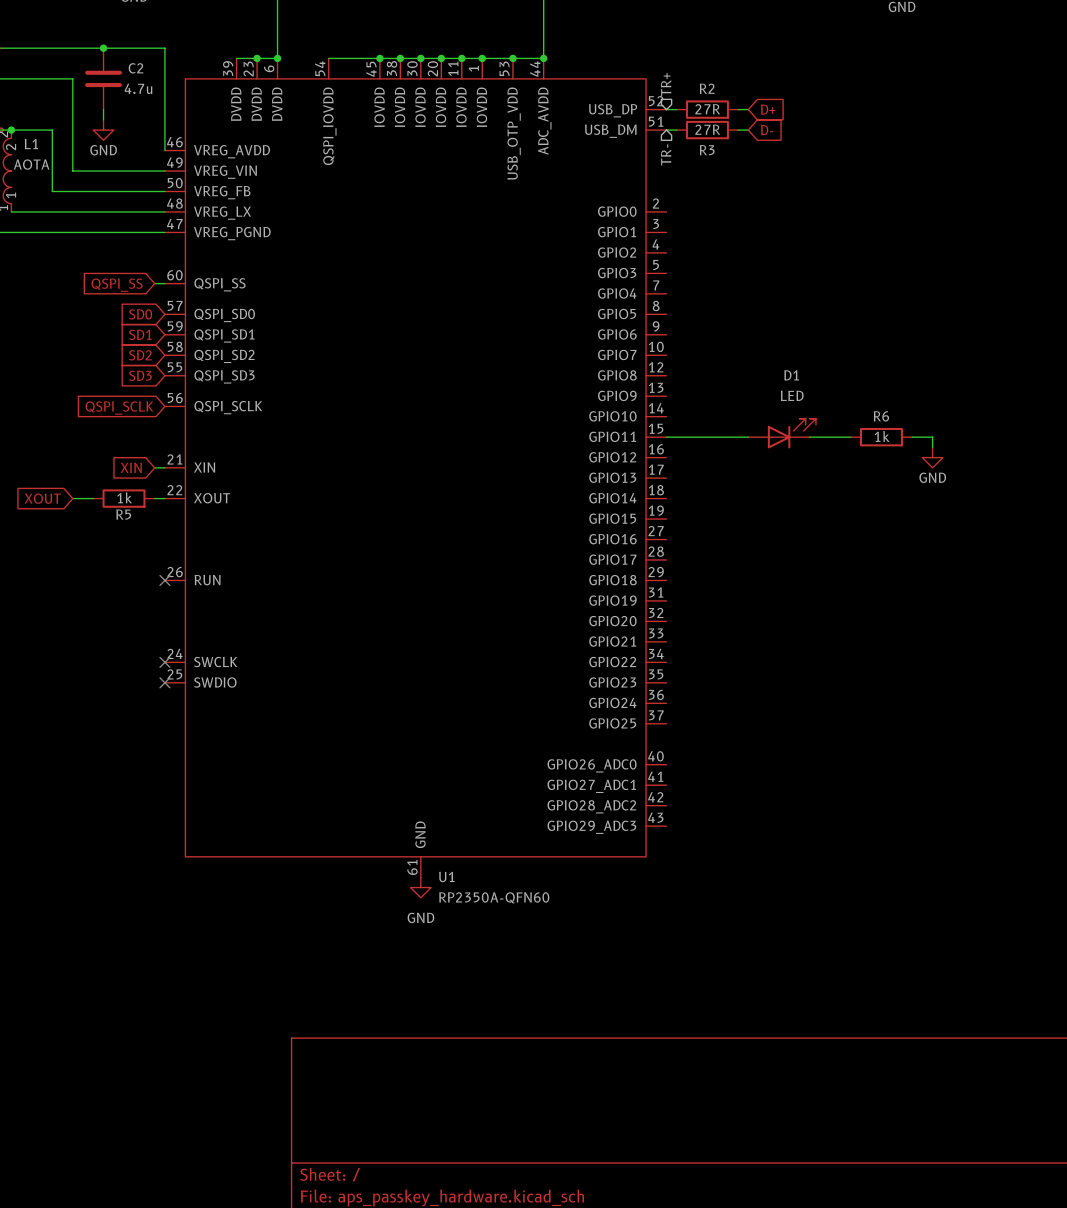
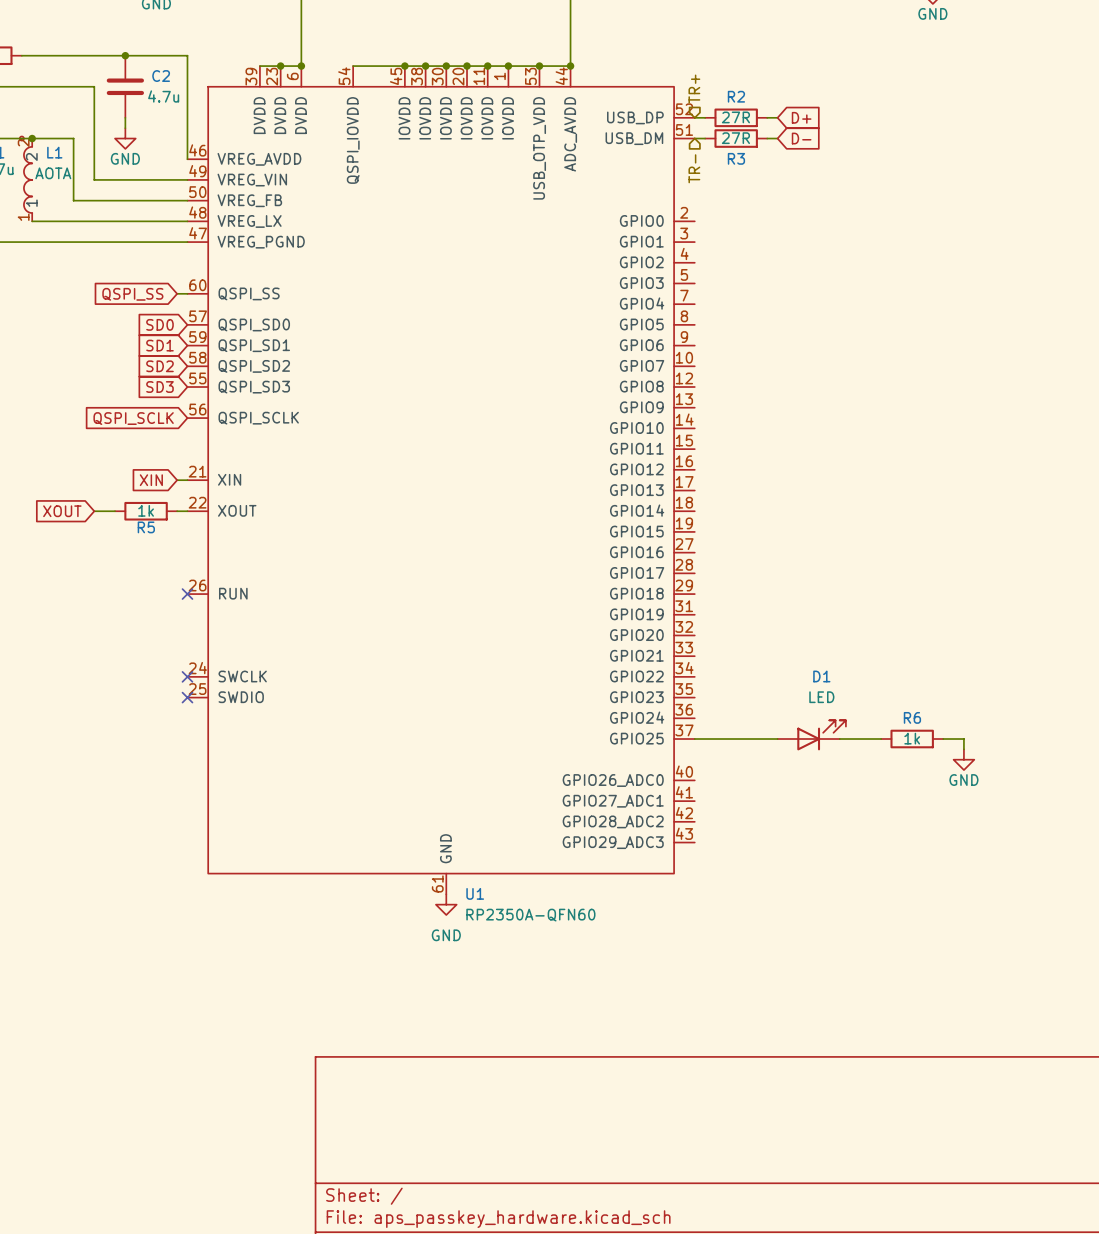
D1 position: (782, 433) -> (811, 735)
wire: (666, 437) (748, 437) -> none
wire: (809, 437) (850, 437) -> none
R6 position: (881, 437) -> (912, 739)
wire: (912, 437) (932, 437) (932, 447) -> none
power symbol: GND (932, 457) -> none
wire: none -> (694, 739) (777, 739)
wire: none -> (839, 739) (881, 739)
wire: none -> (943, 739) (963, 739) (963, 749)
power symbol: none -> GND (963, 759)

